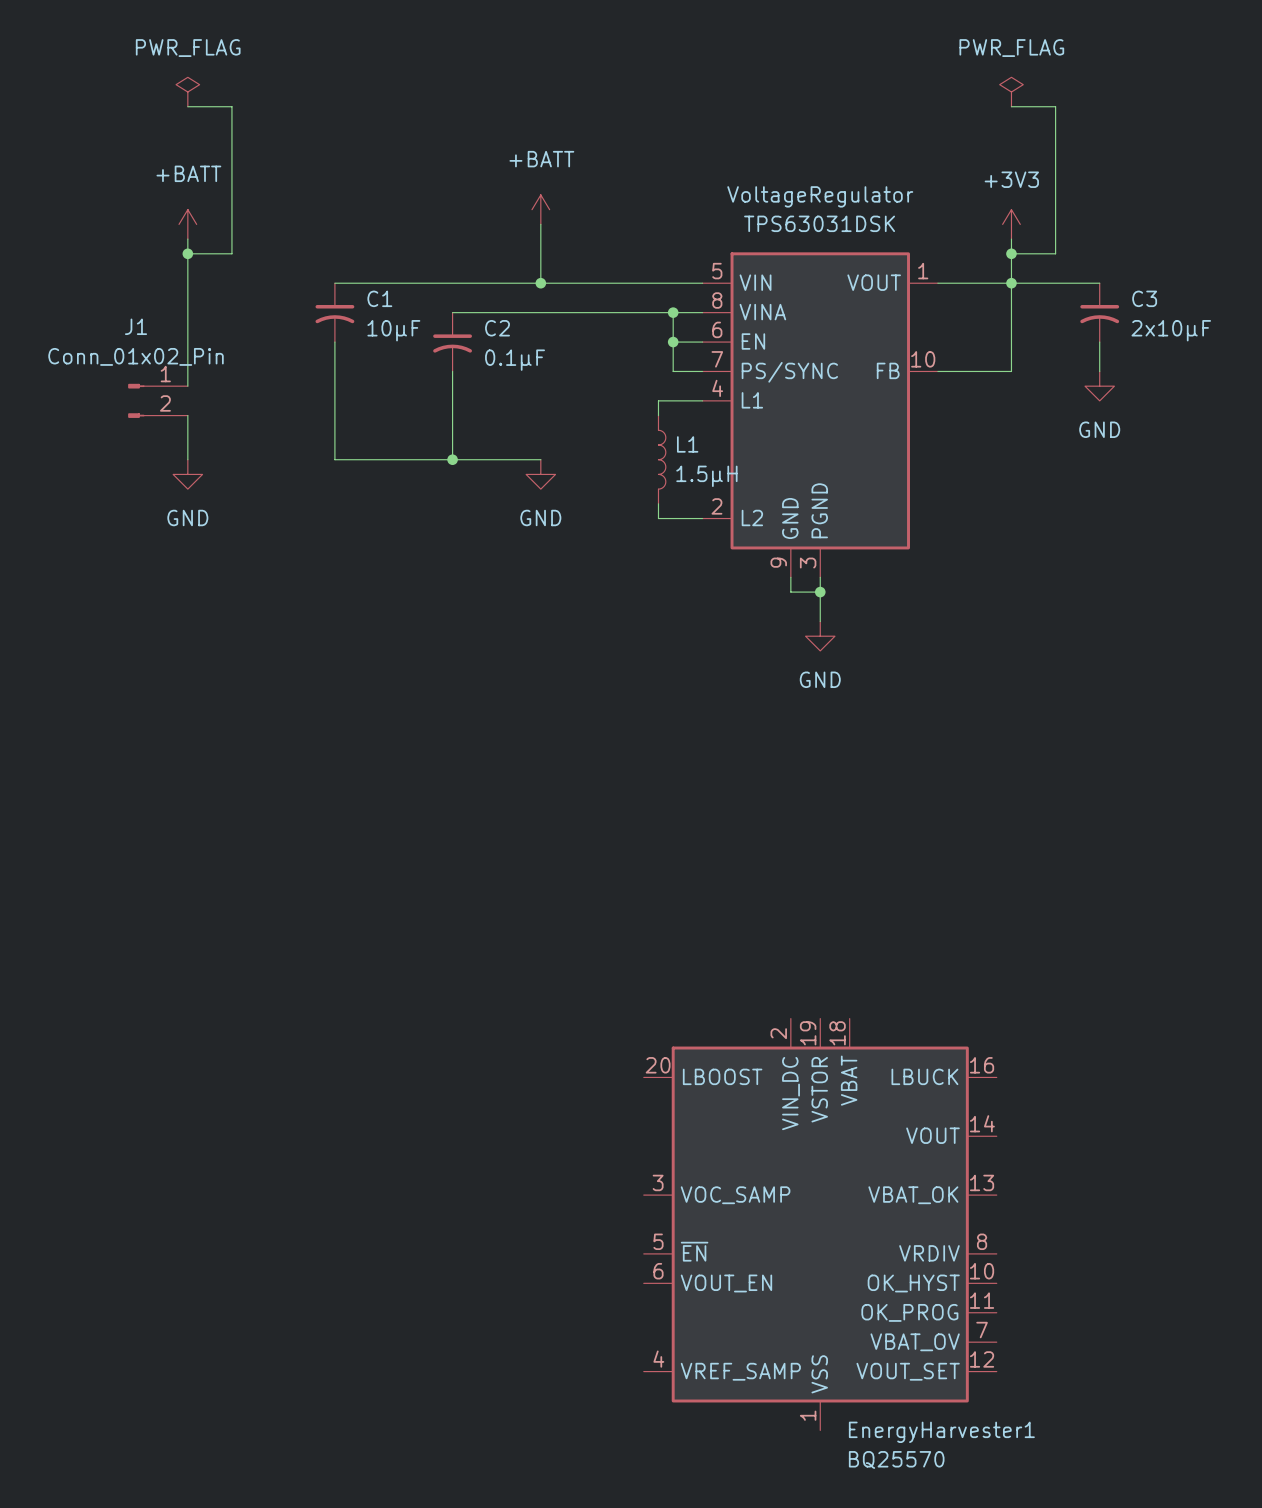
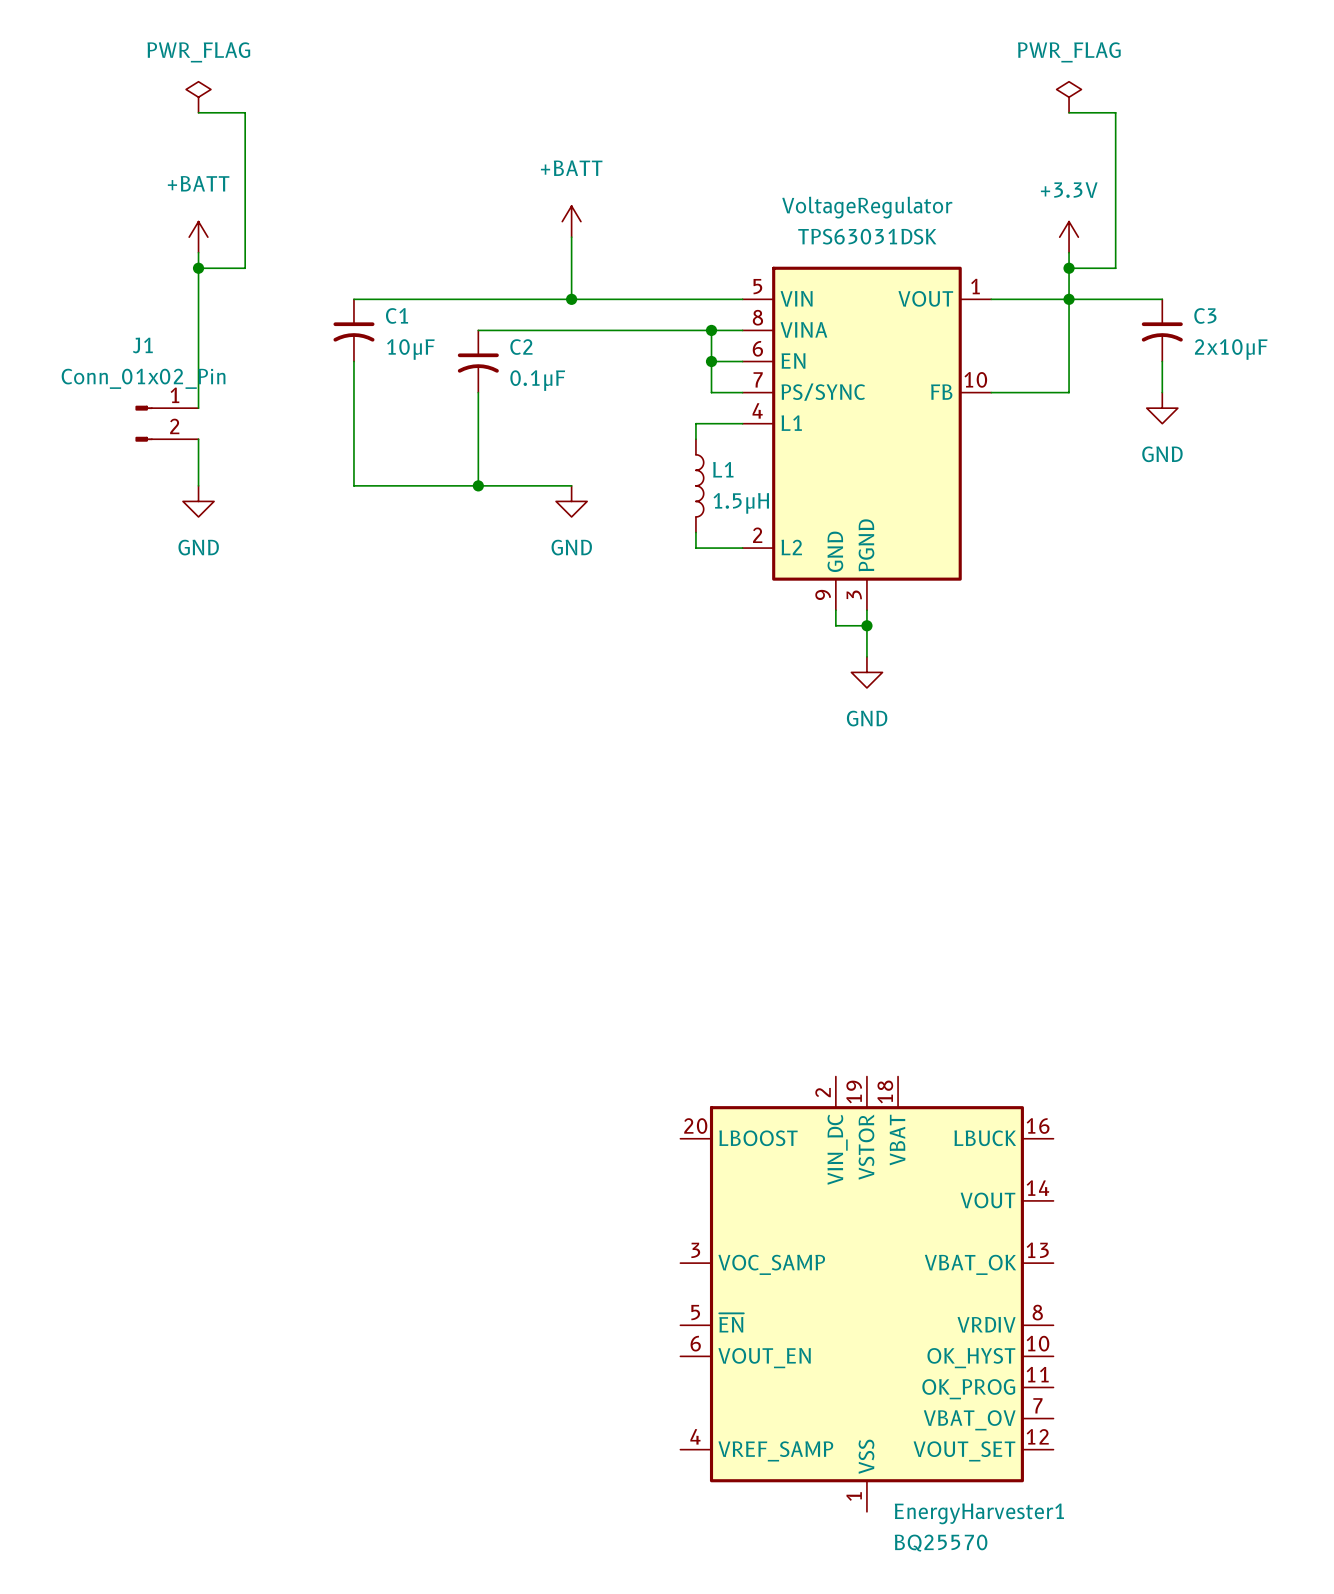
power symbol: +3V3 (1011, 224) -> +3.3V (1069, 237)

